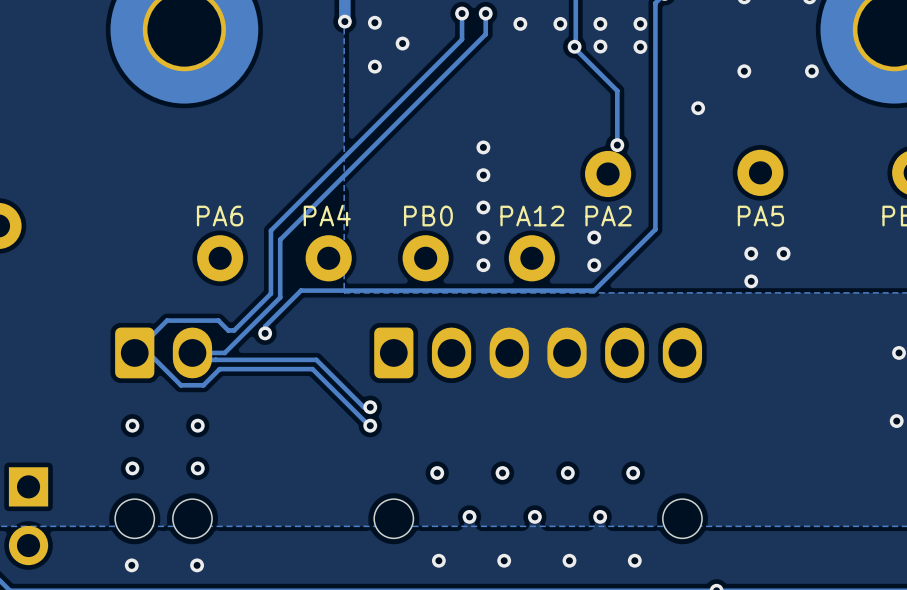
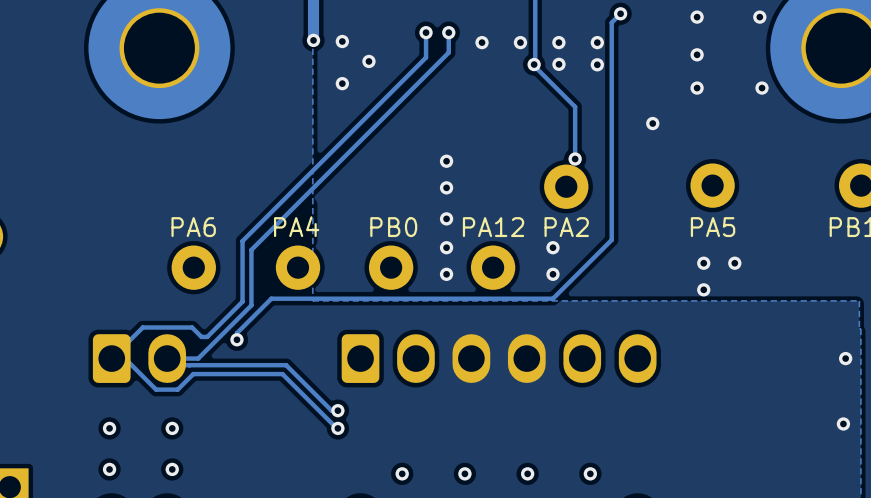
via: none -> (697, 54)

